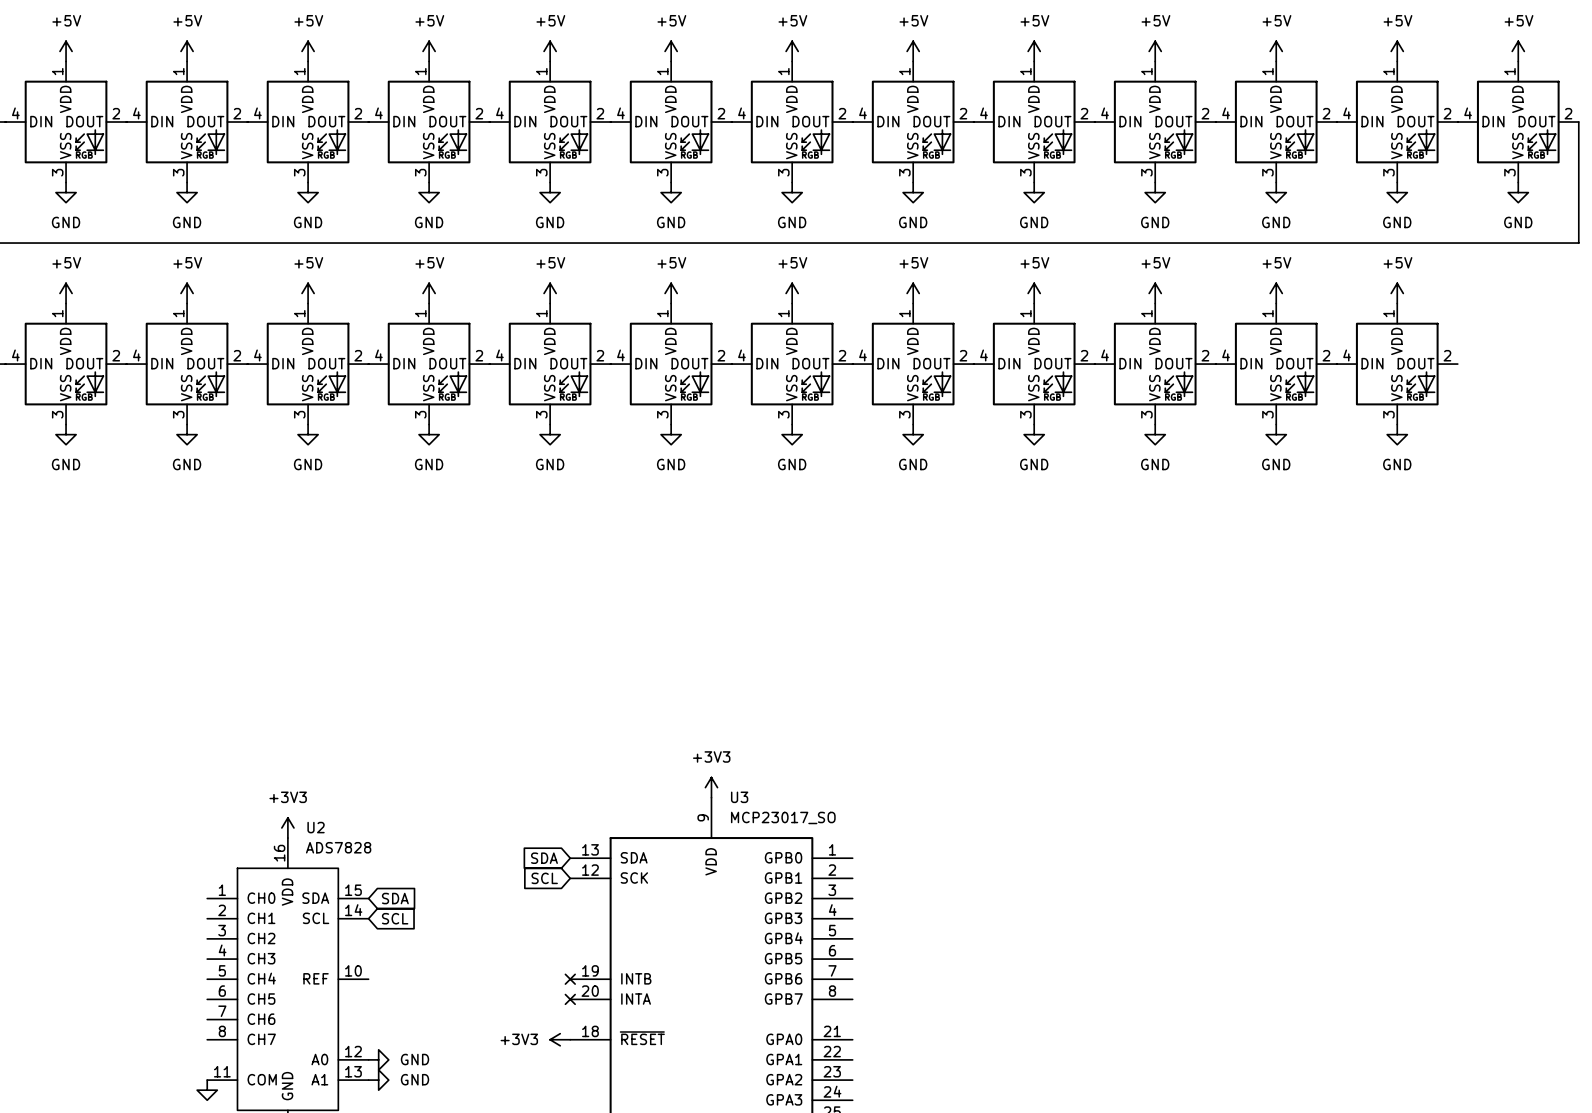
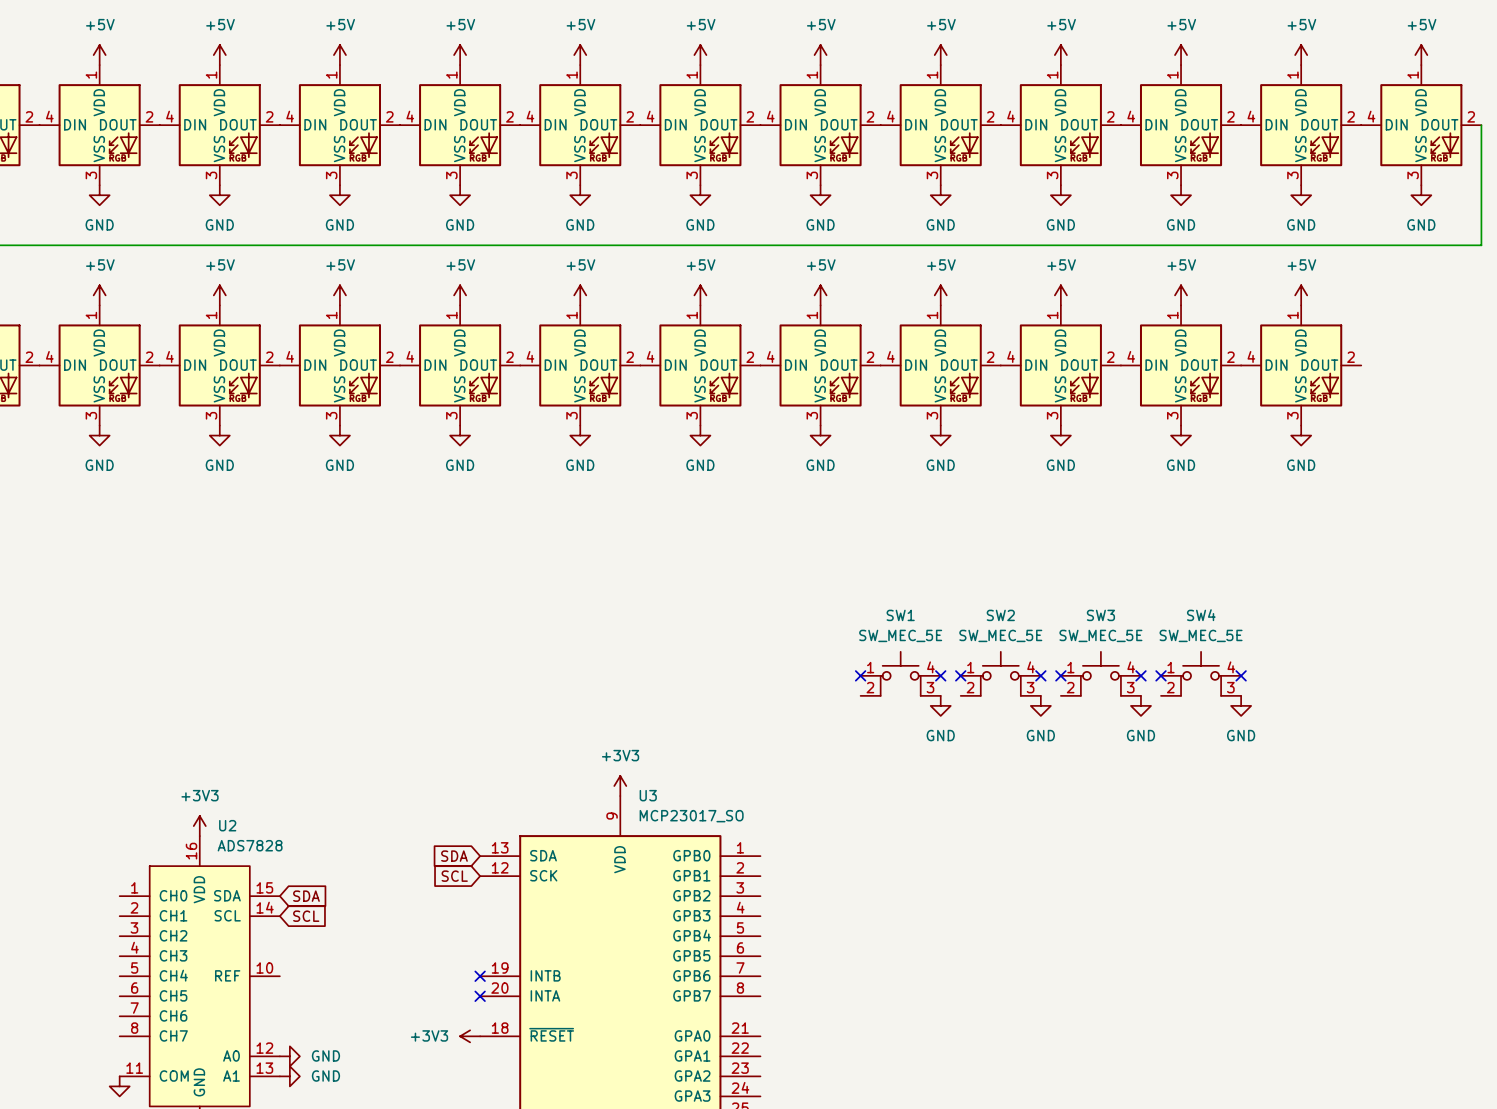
SW1: none -> SW_MEC_5E (900, 673)
SW2: none -> SW_MEC_5E (1000, 673)
SW3: none -> SW_MEC_5E (1100, 673)
SW4: none -> SW_MEC_5E (1201, 673)
no-connect mark: none -> (860, 675)
no-connect mark: none -> (940, 675)
no-connect mark: none -> (960, 675)
no-connect mark: none -> (1040, 675)
no-connect mark: none -> (1060, 675)
no-connect mark: none -> (1140, 675)
no-connect mark: none -> (1161, 675)
no-connect mark: none -> (1241, 675)
power symbol: none -> GND (940, 705)
power symbol: none -> GND (1040, 705)
power symbol: none -> GND (1140, 705)
power symbol: none -> GND (1241, 705)

